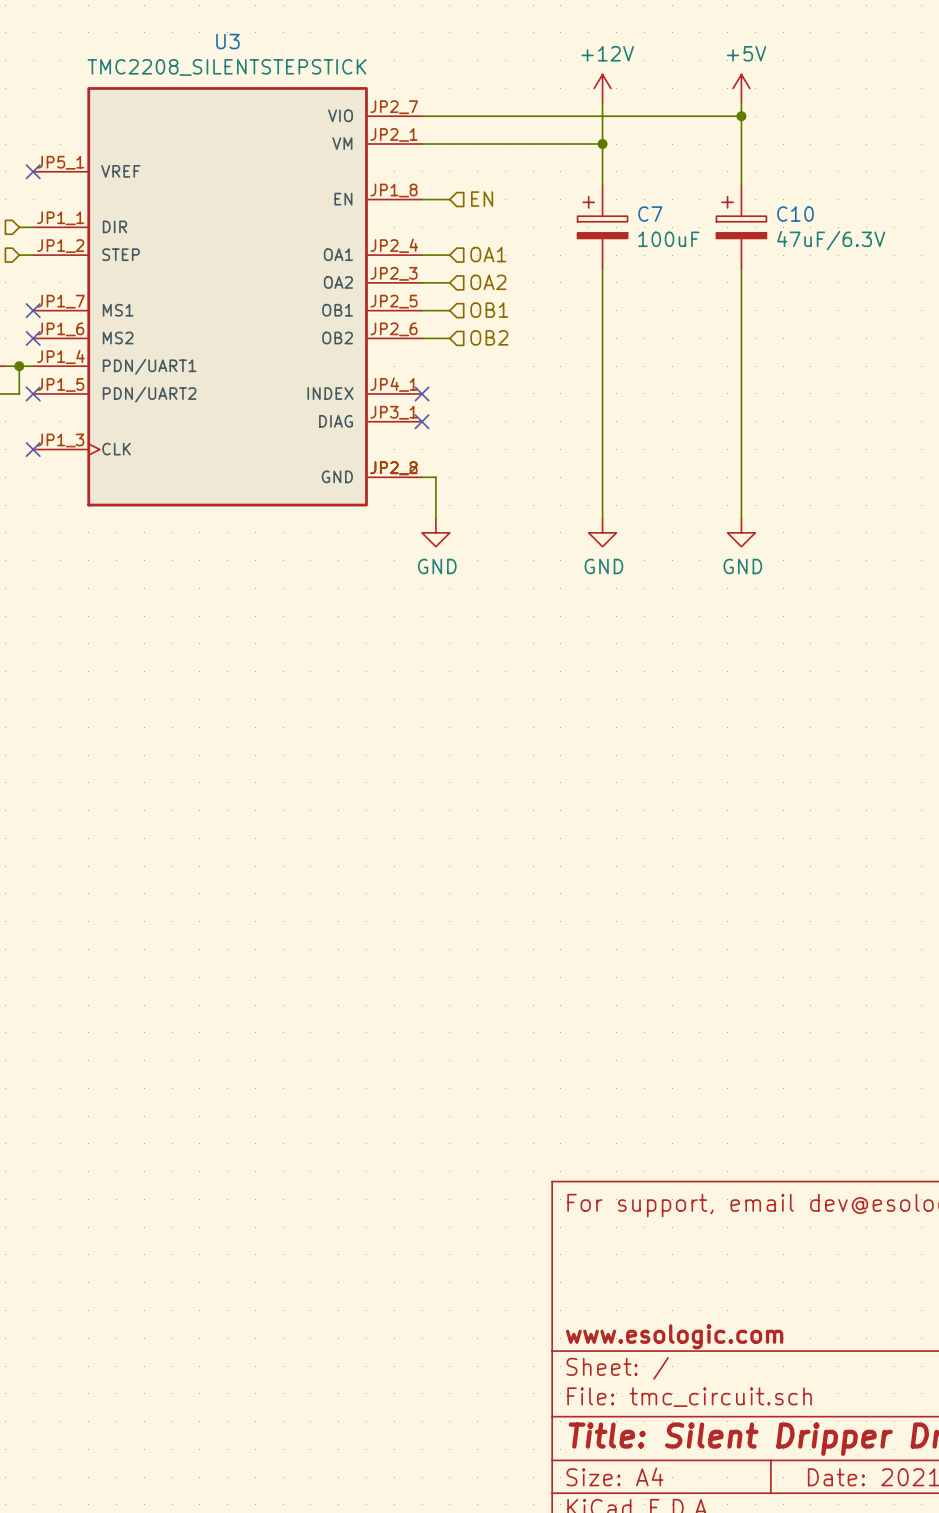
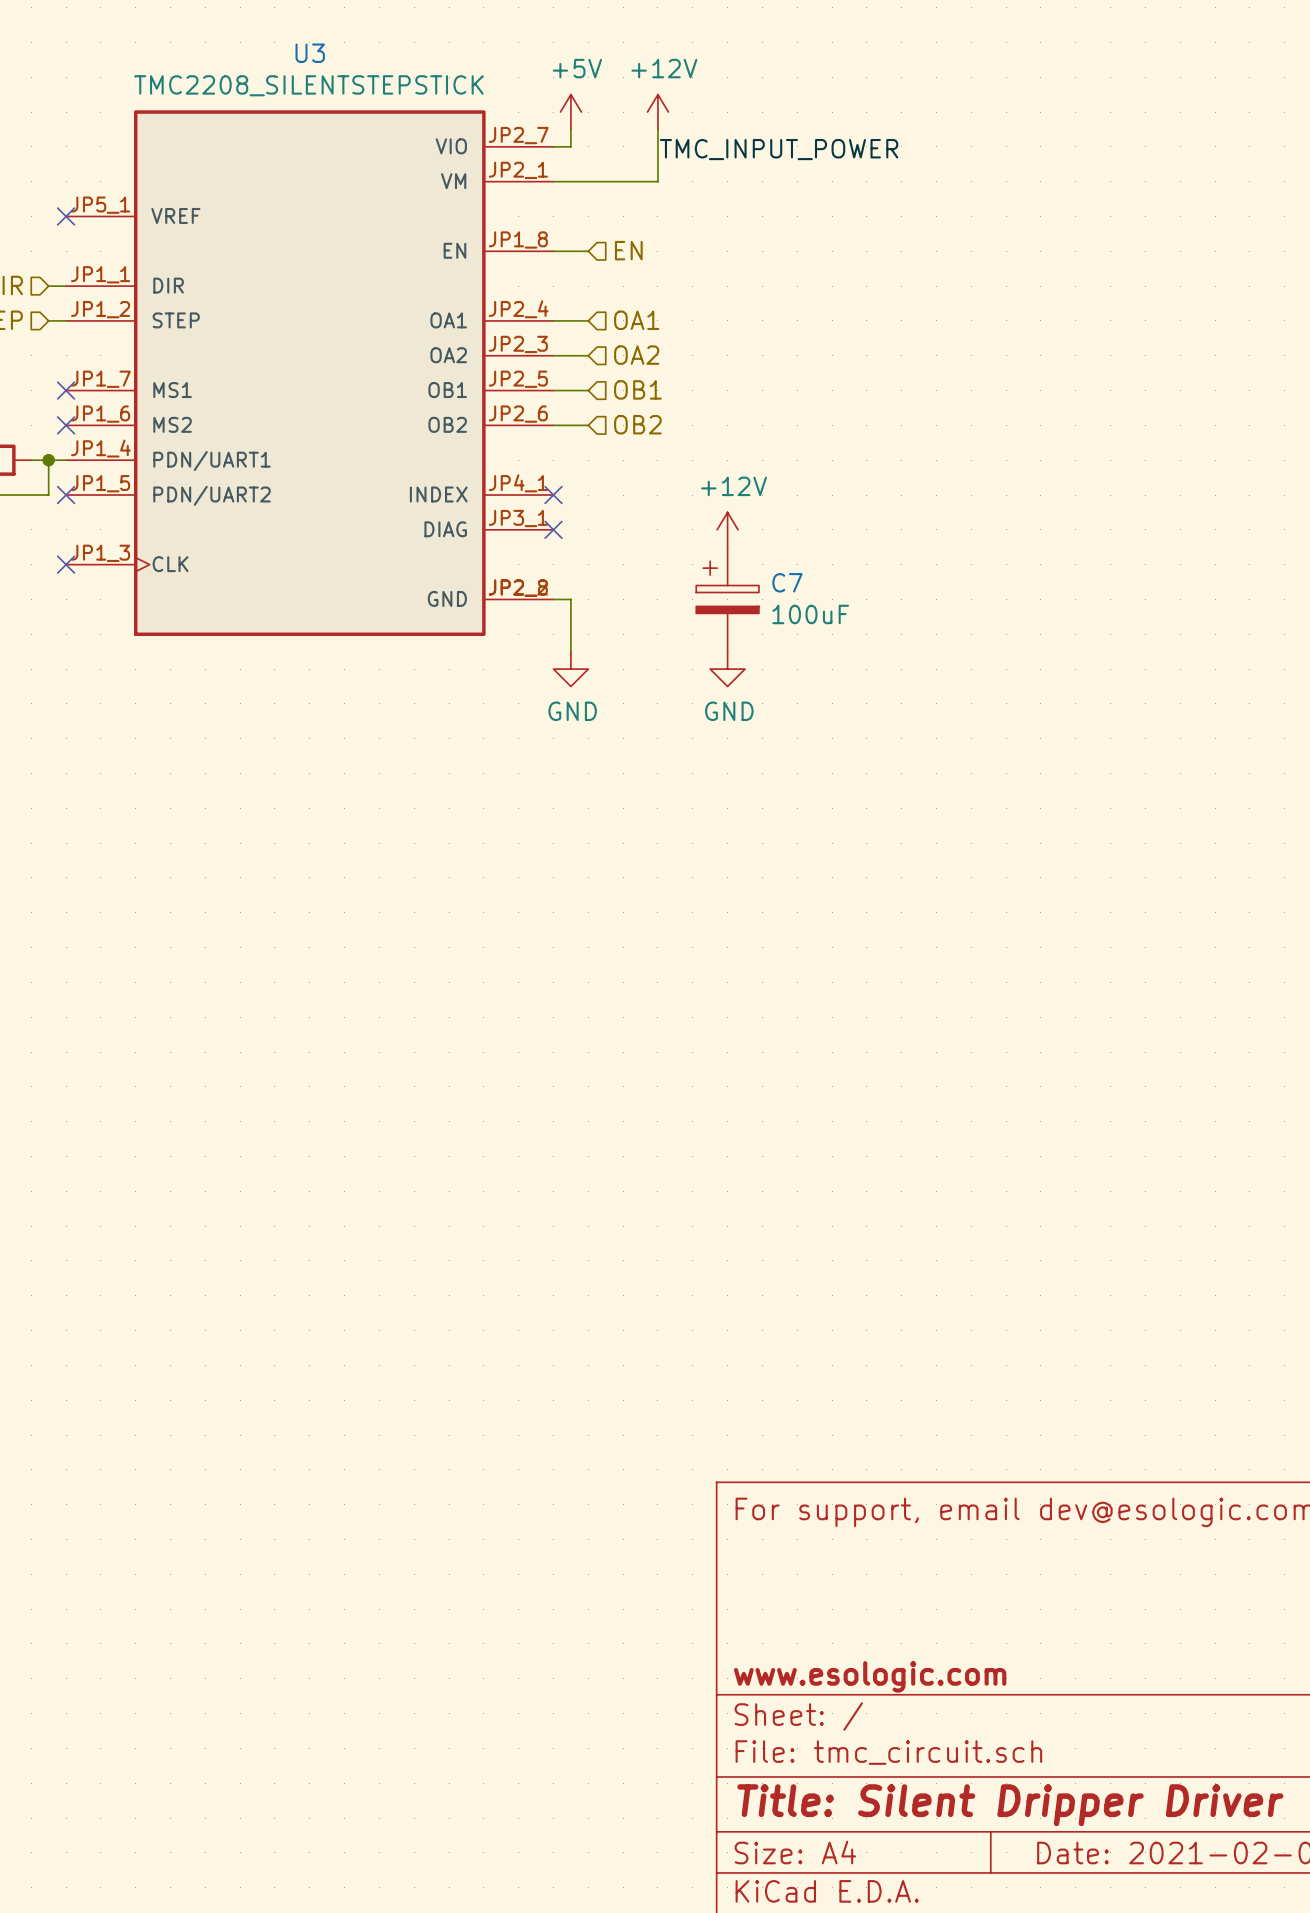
power symbol: none -> +5V (570, 112)
power symbol position: +12V (602, 88) -> +12V (657, 112)
power symbol: +5V (741, 88) -> none
wire: (602, 102) (602, 185) -> none
wire: (741, 102) (741, 185) -> none
wire: (435, 116) (741, 116) -> (570, 146) (570, 129)
junction: (741, 116) -> none
label: none -> TMC_INPUT_POWER (779, 149)
wire: (505, 144) (602, 144) -> (657, 181) (657, 129)
junction: (602, 144) -> none
C7 position: (602, 227) -> (727, 599)
C10: 47uF/6.3V (741, 227) -> none
wire: (602, 268) (602, 518) -> none
wire: (741, 268) (741, 518) -> none
power symbol: none -> +12V (727, 529)
power symbol position: GND (602, 532) -> GND (727, 669)
power symbol: GND (741, 532) -> none

